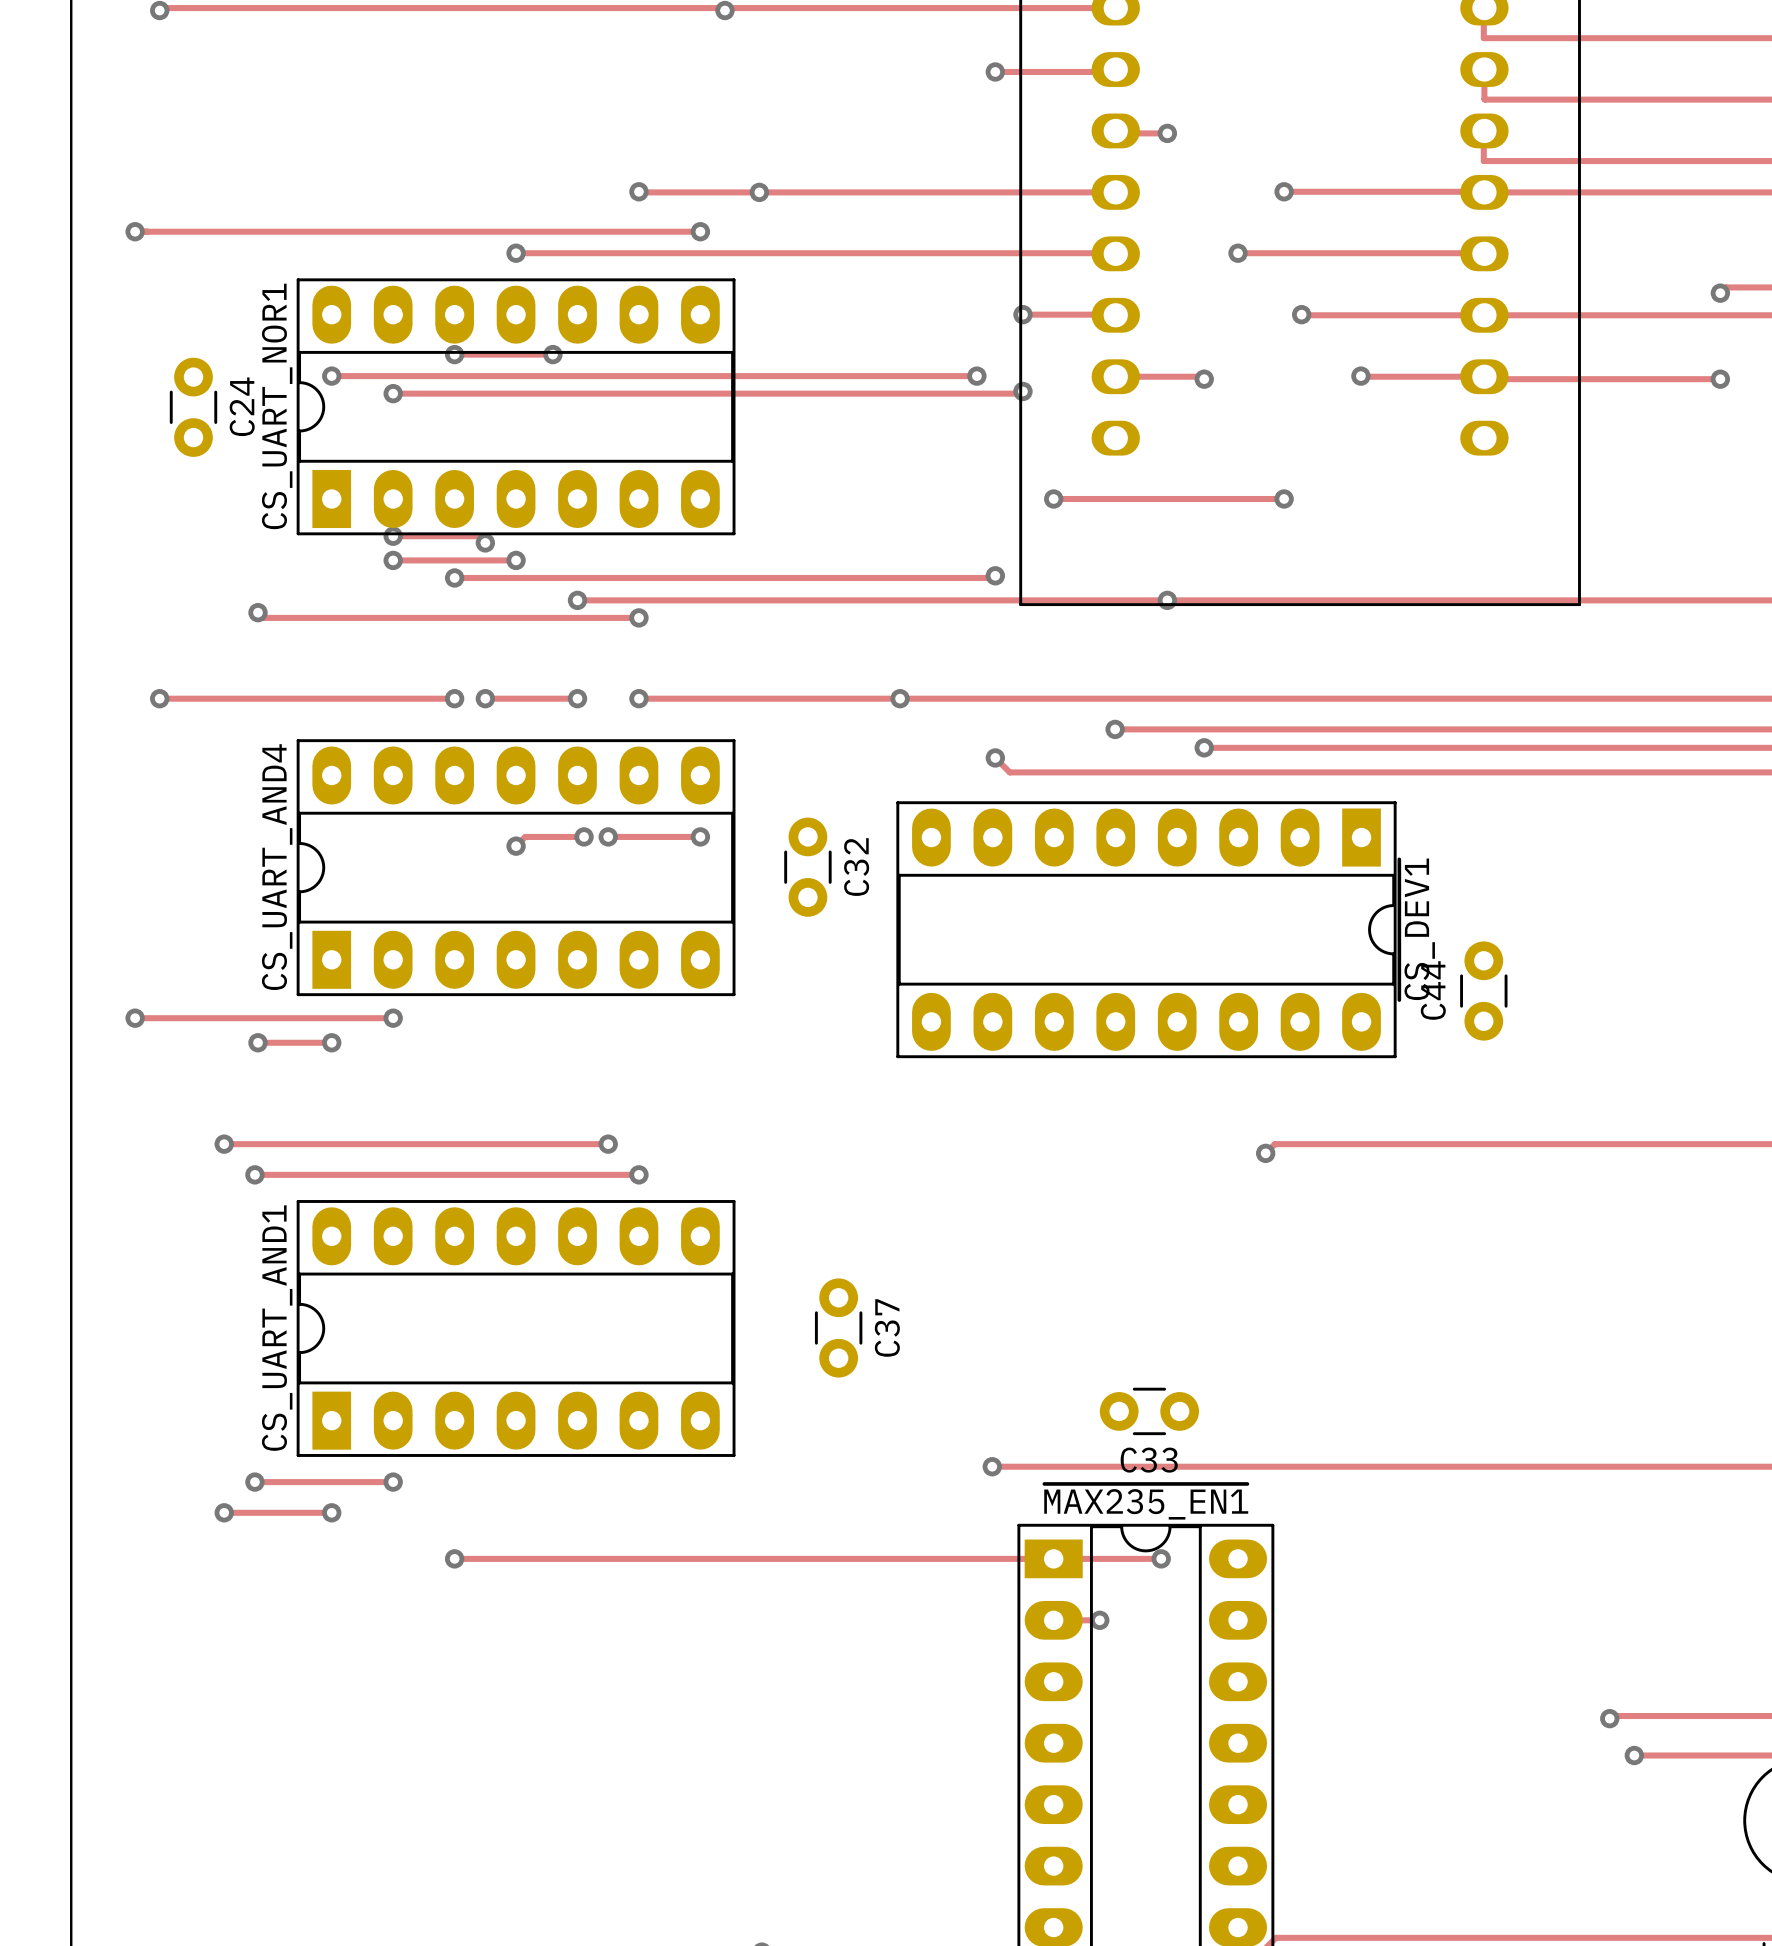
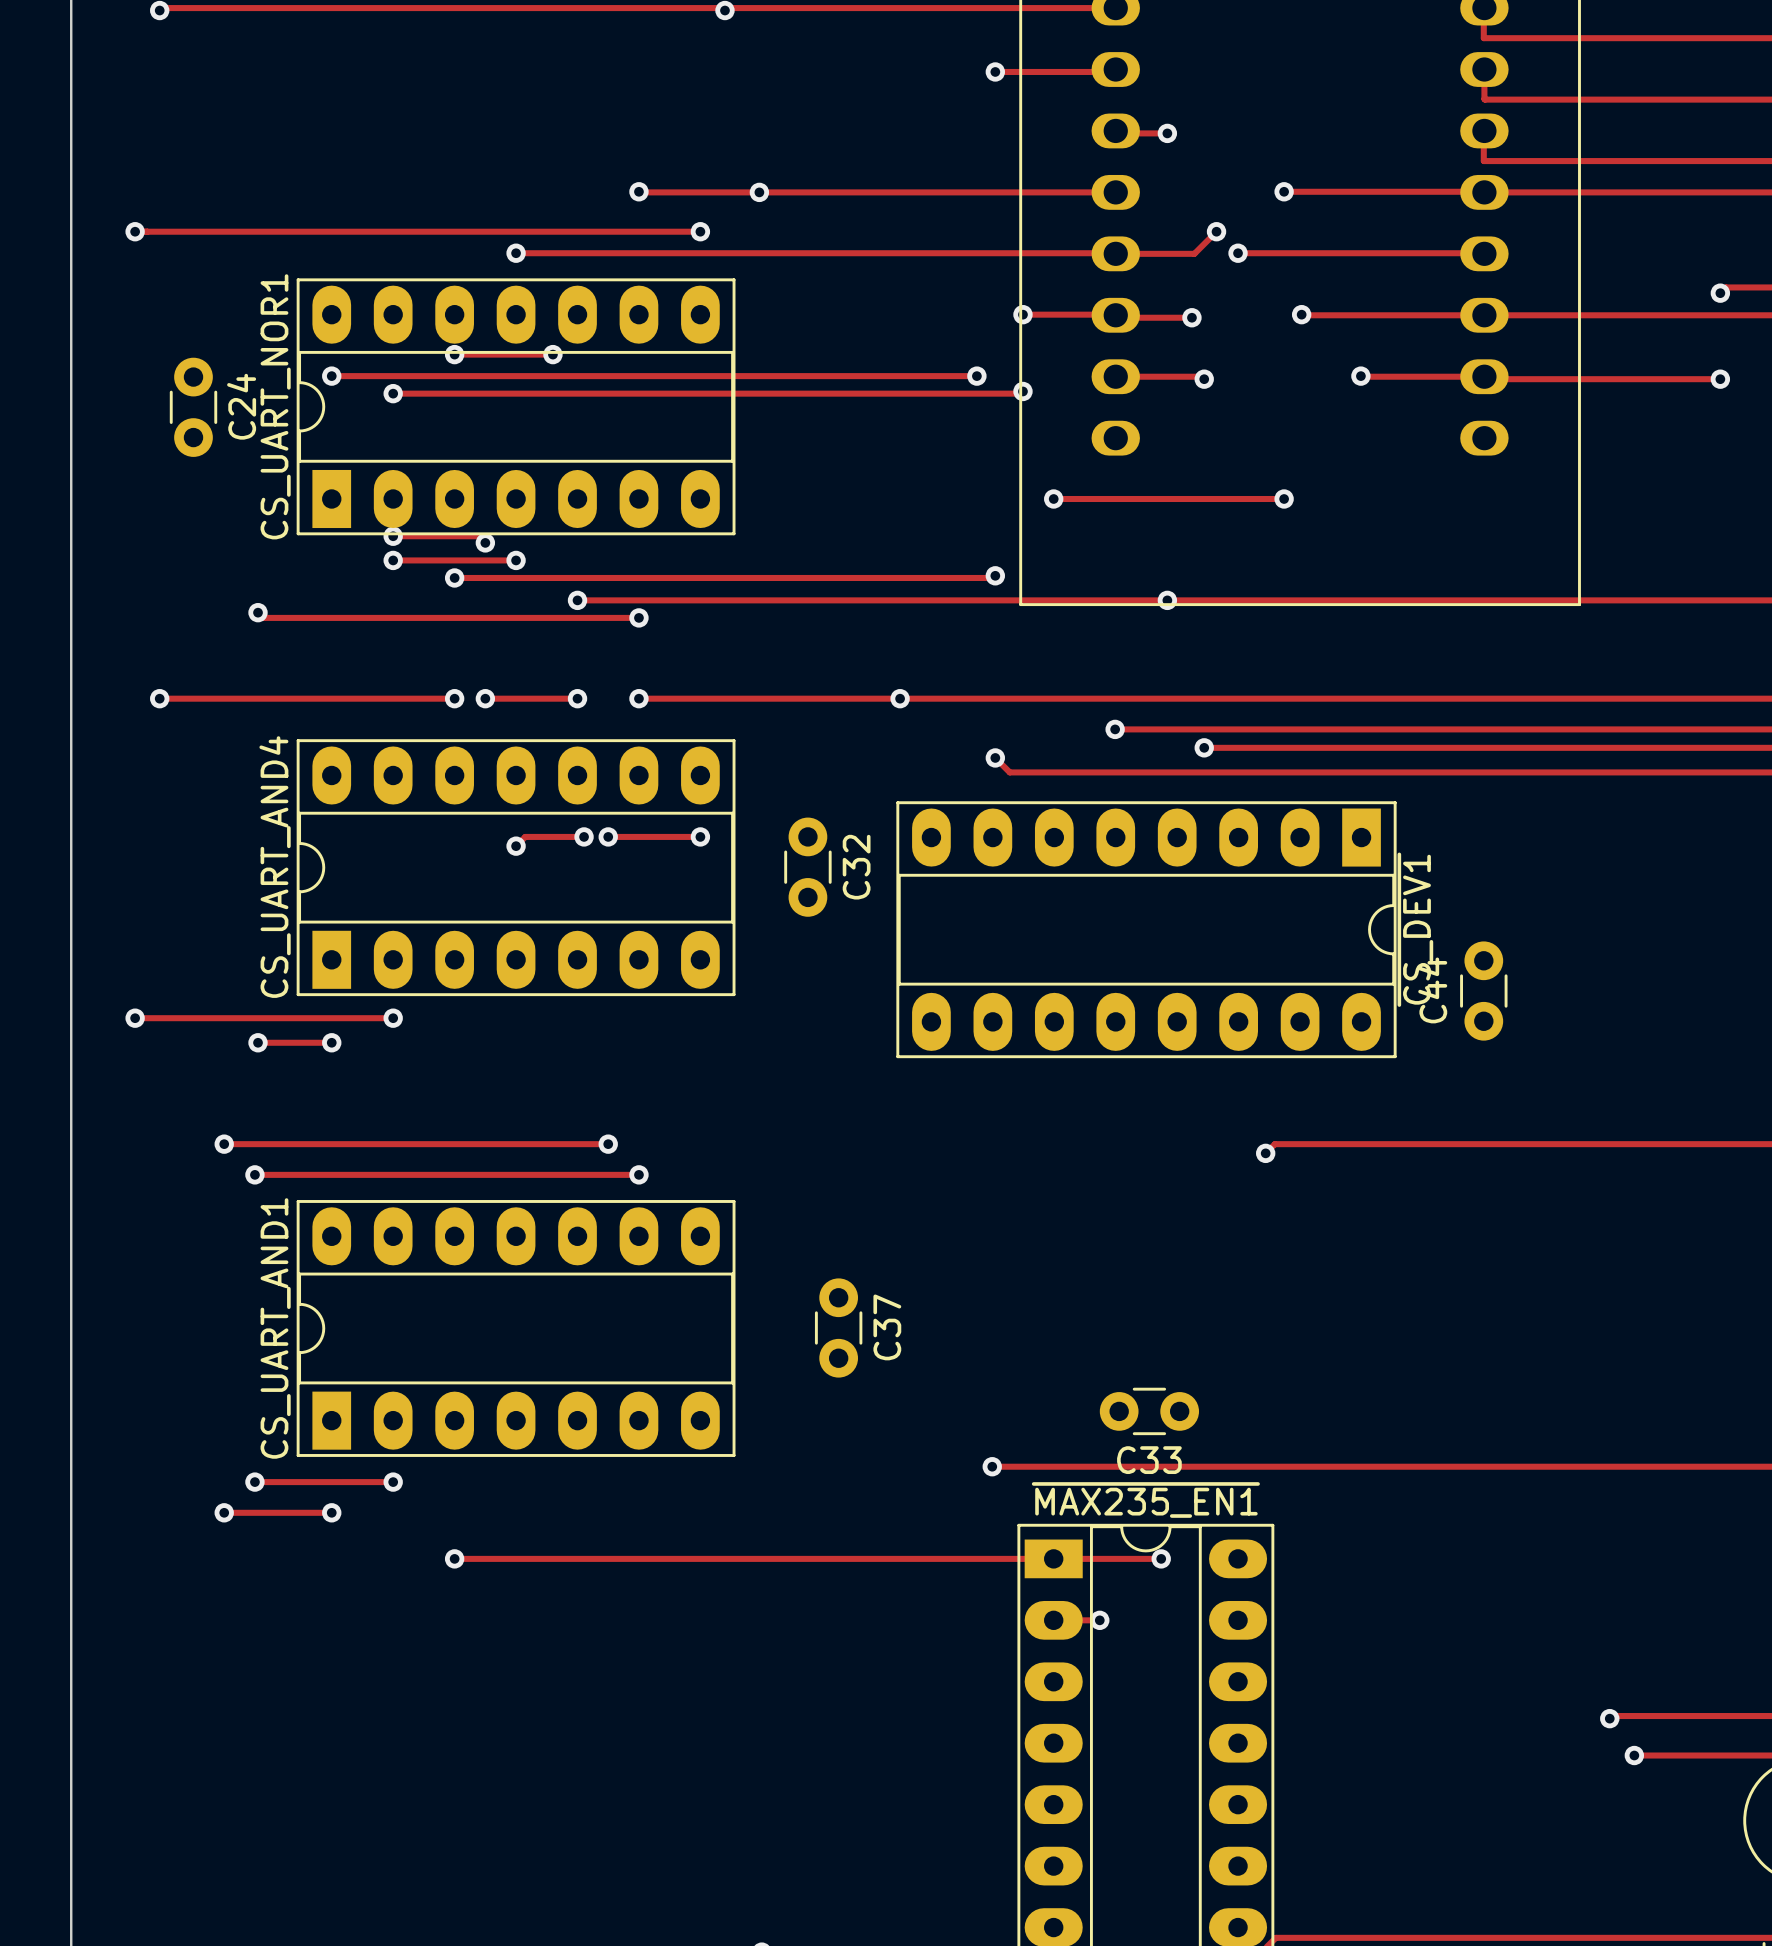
track: none -> (1216, 231) (1194, 253) (1115, 253)
via: none -> (1216, 231)
track: none -> (1115, 315) (1118, 317) (1191, 317)
via: none -> (1191, 317)

